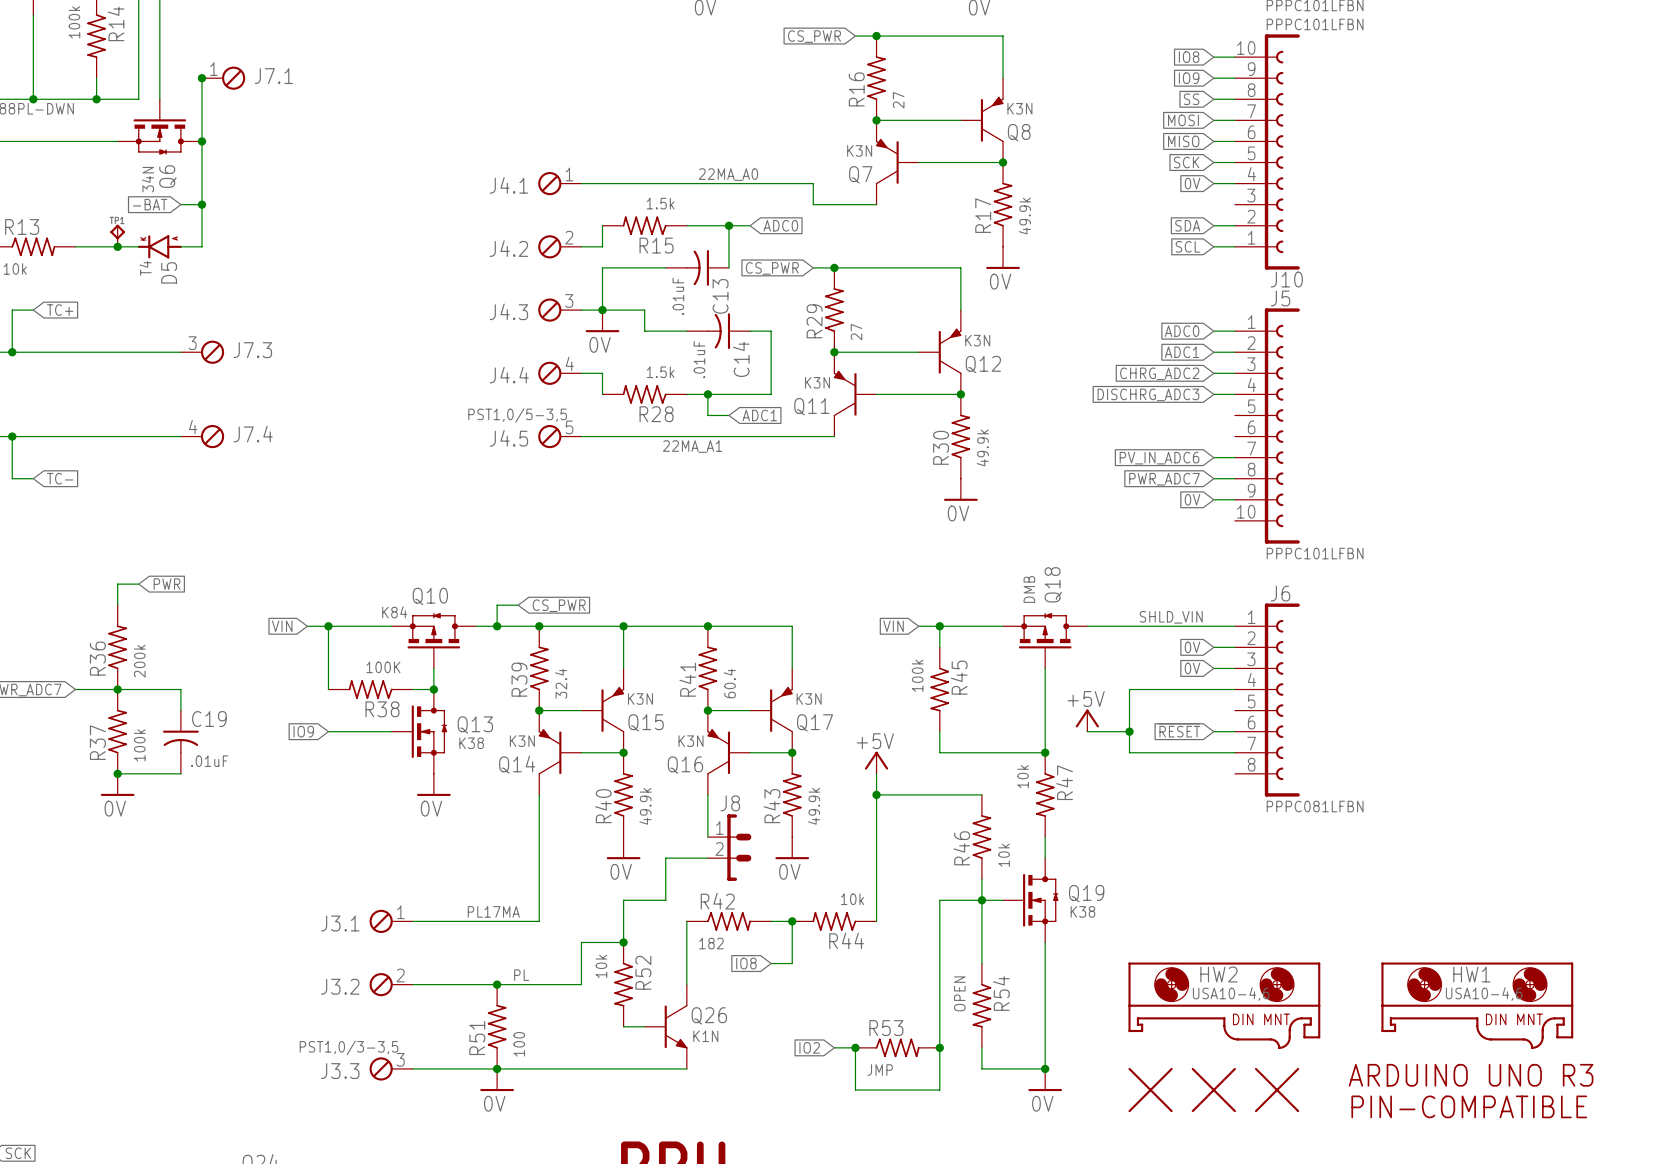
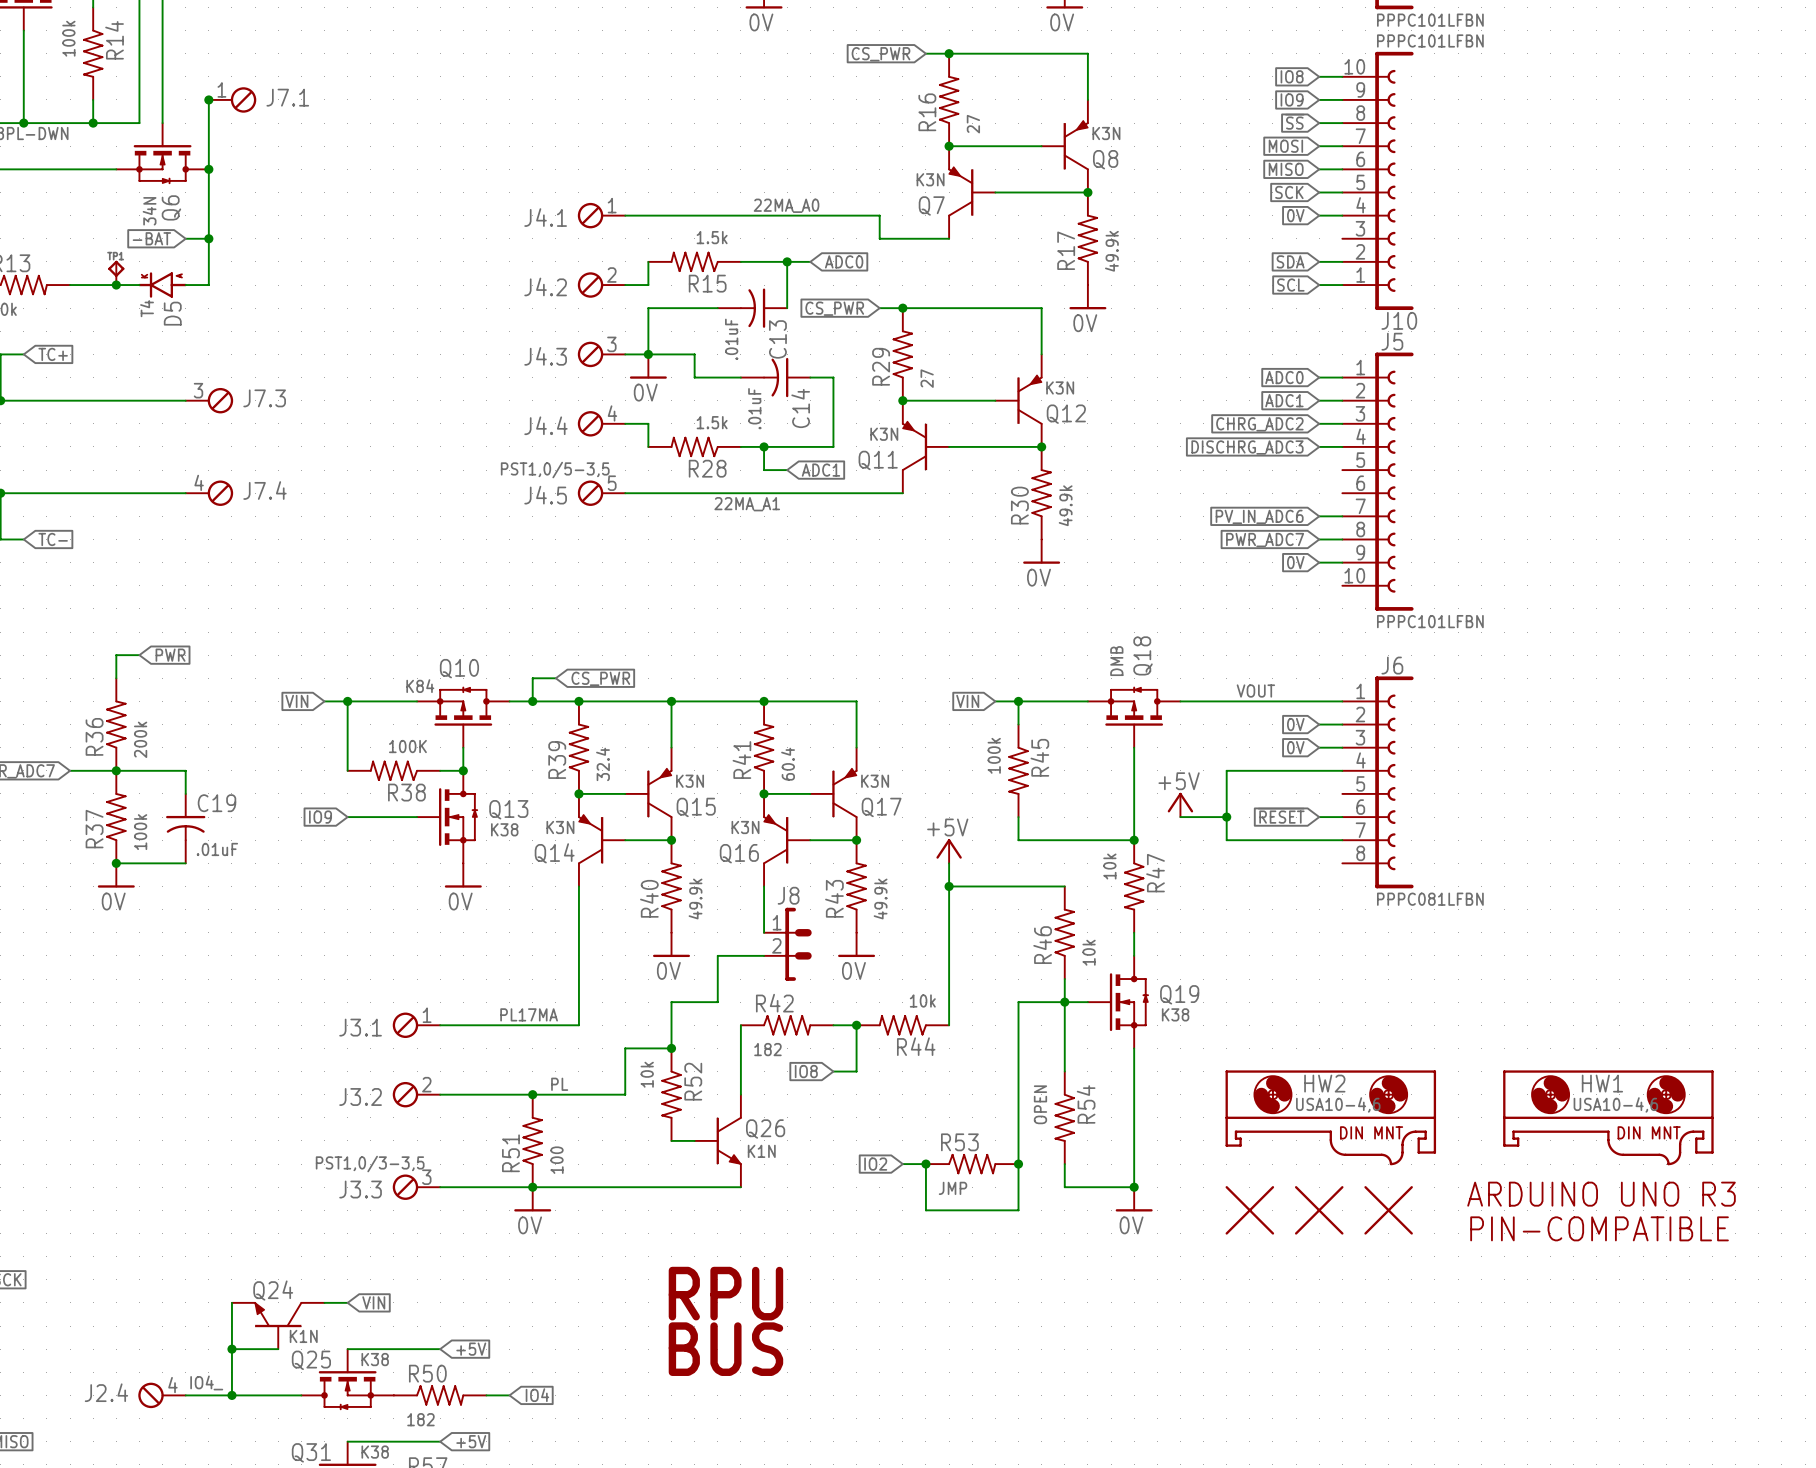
label: SHLD_VIN (1171, 617) -> VOUT (1255, 691)

